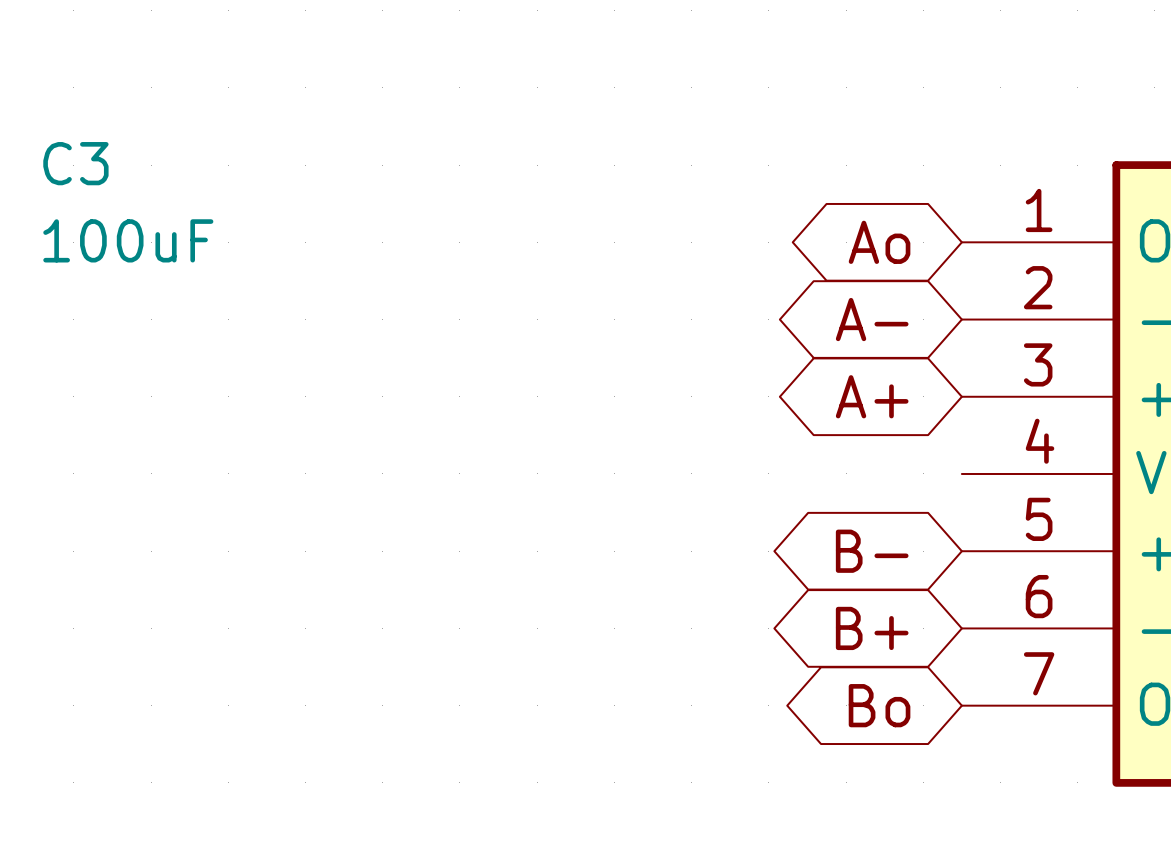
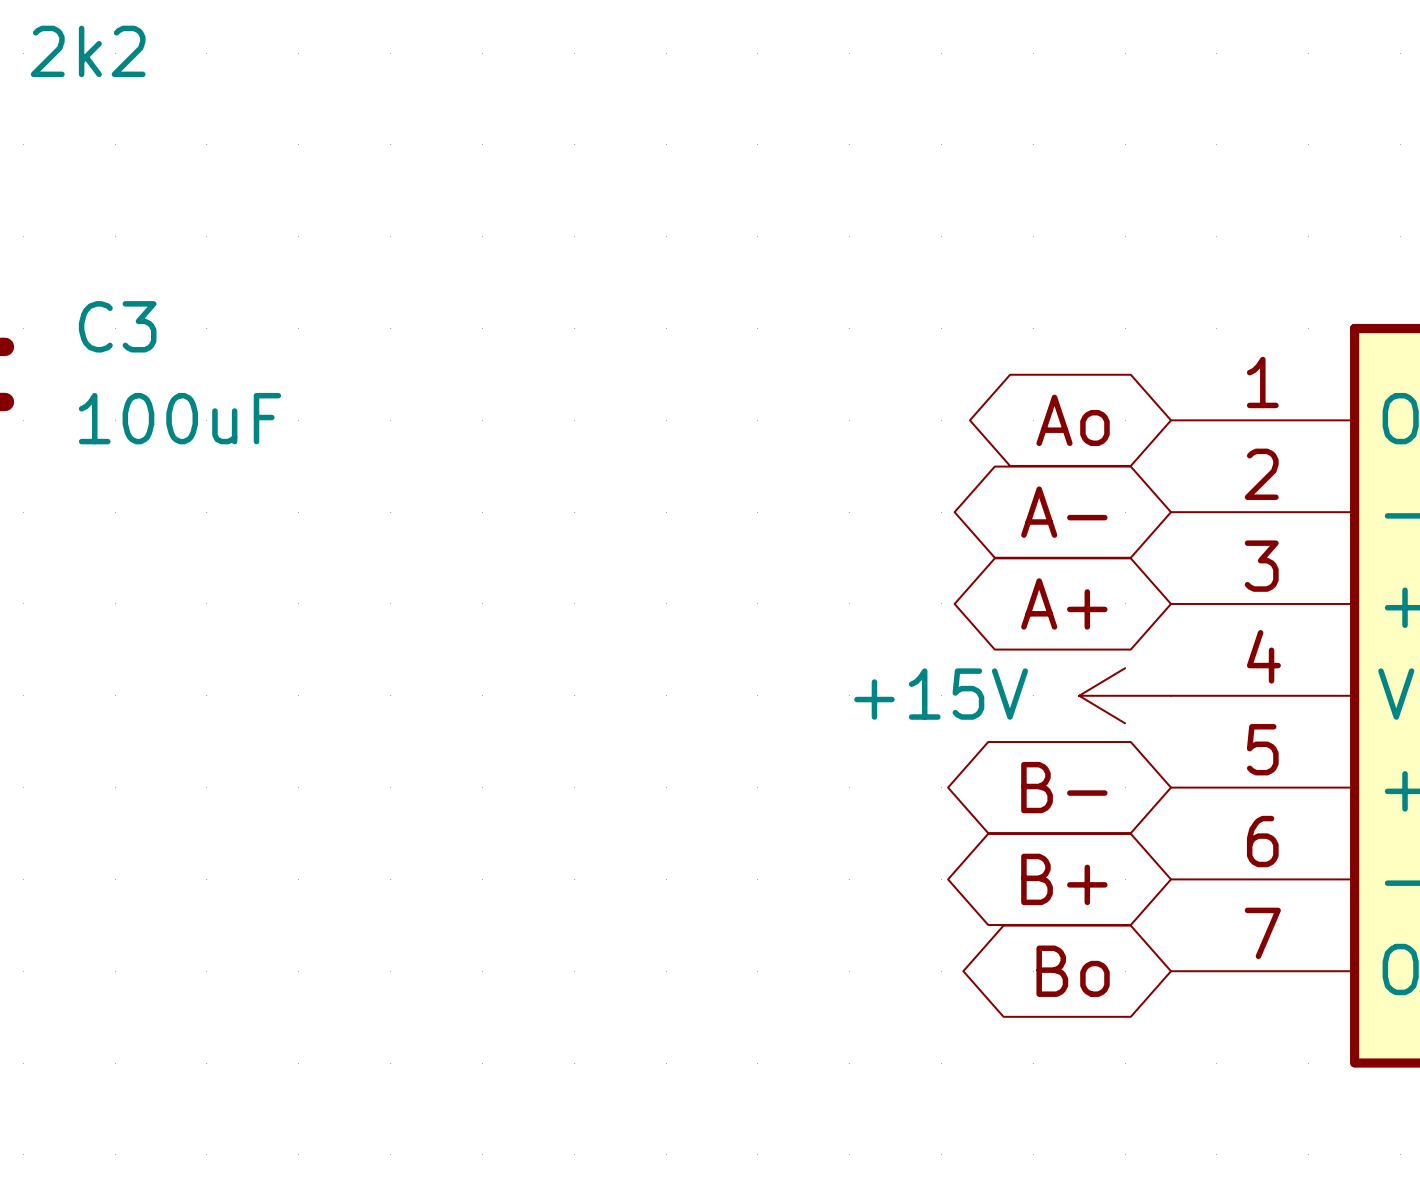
power symbol: none -> +15V (1125, 695)

